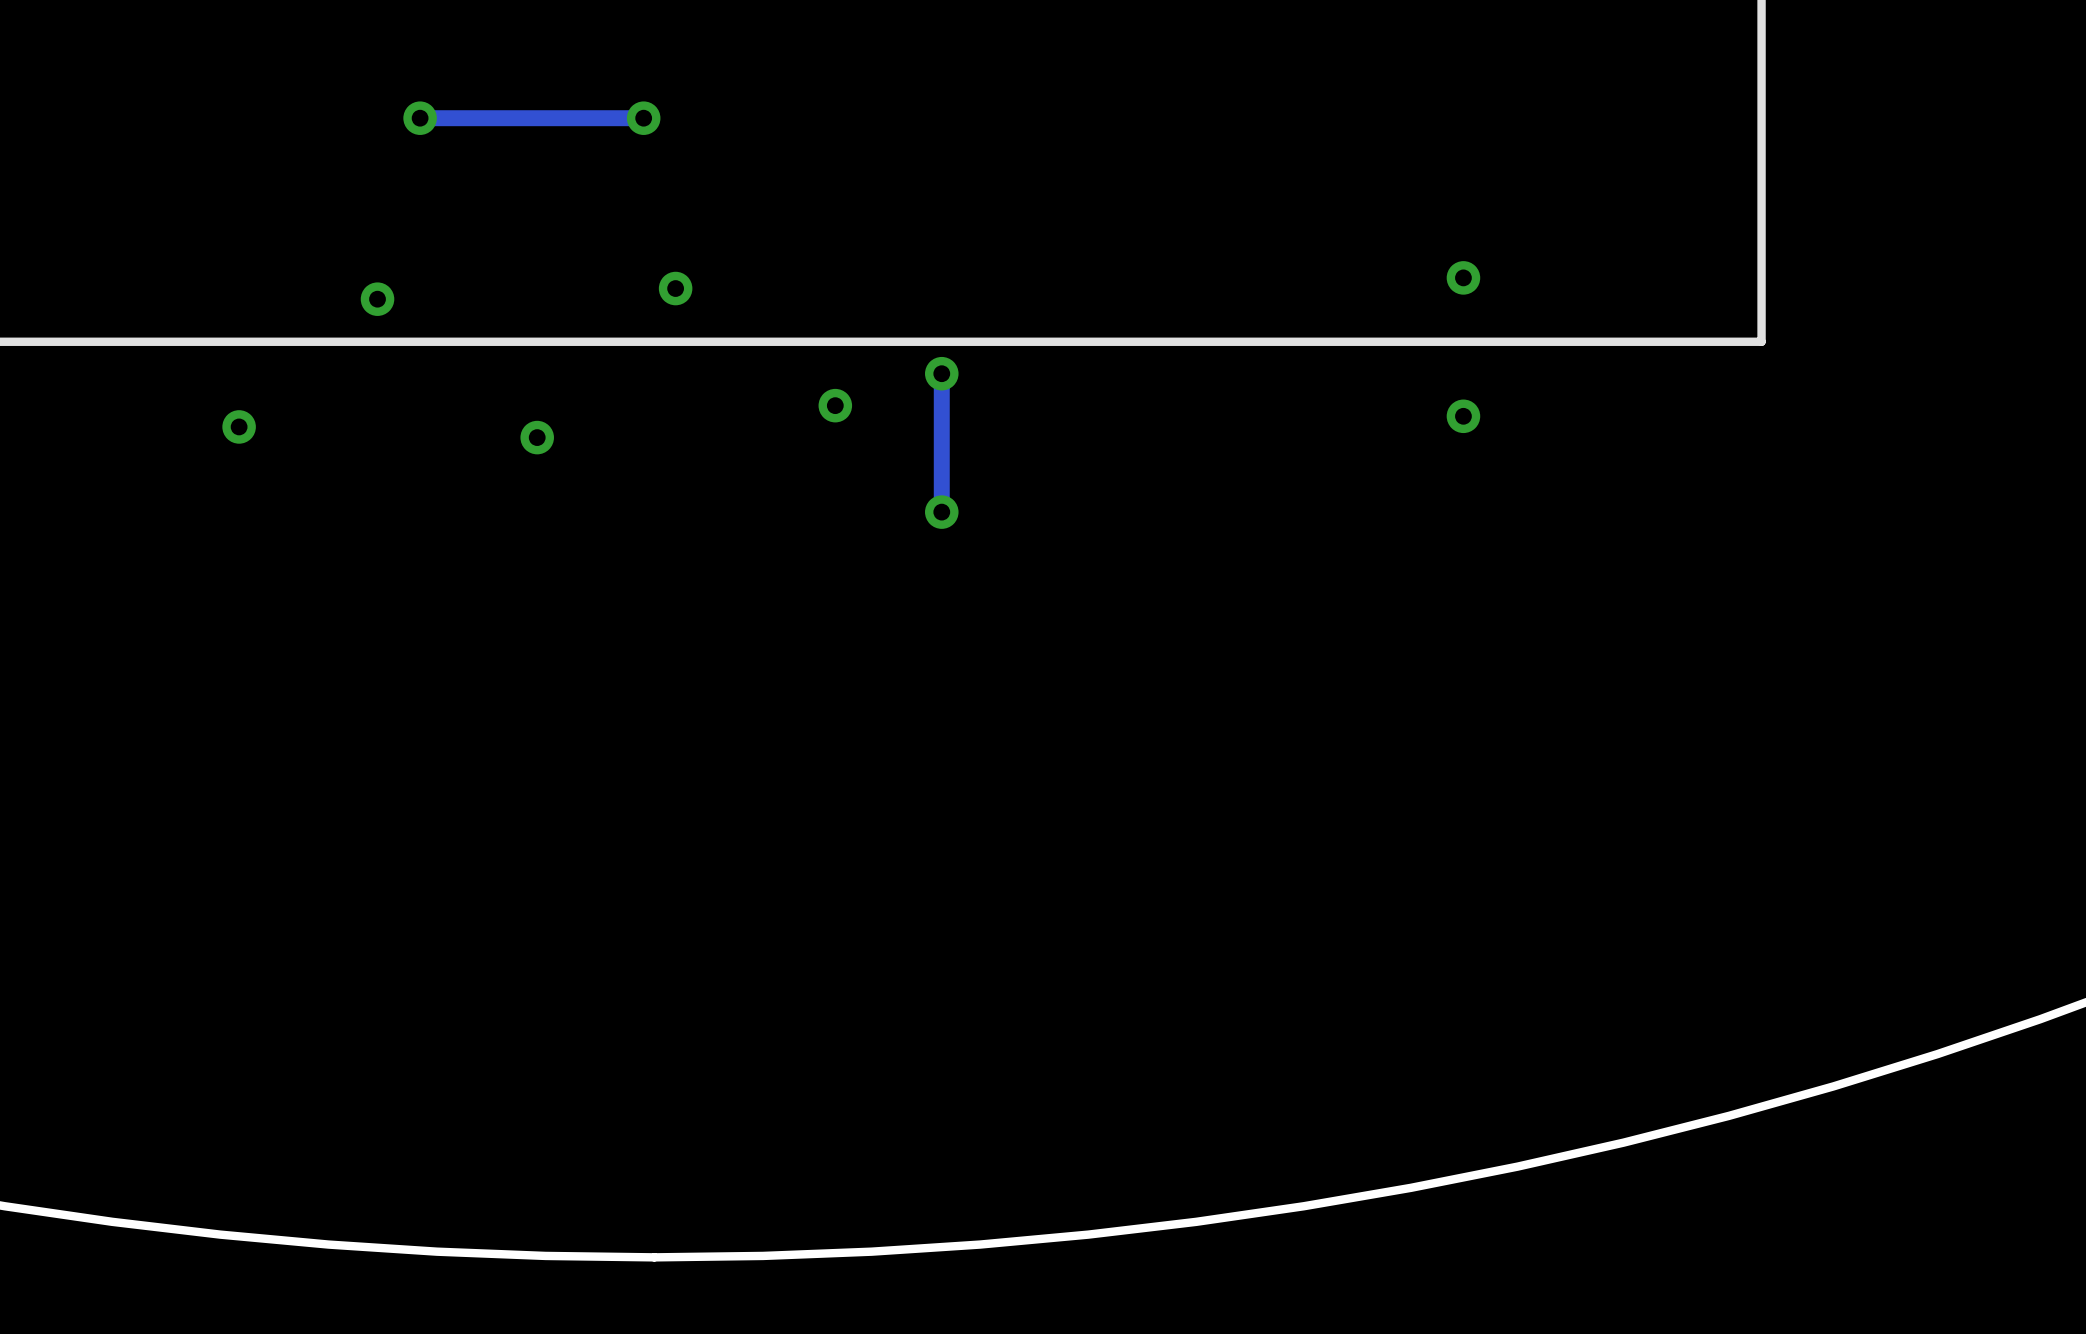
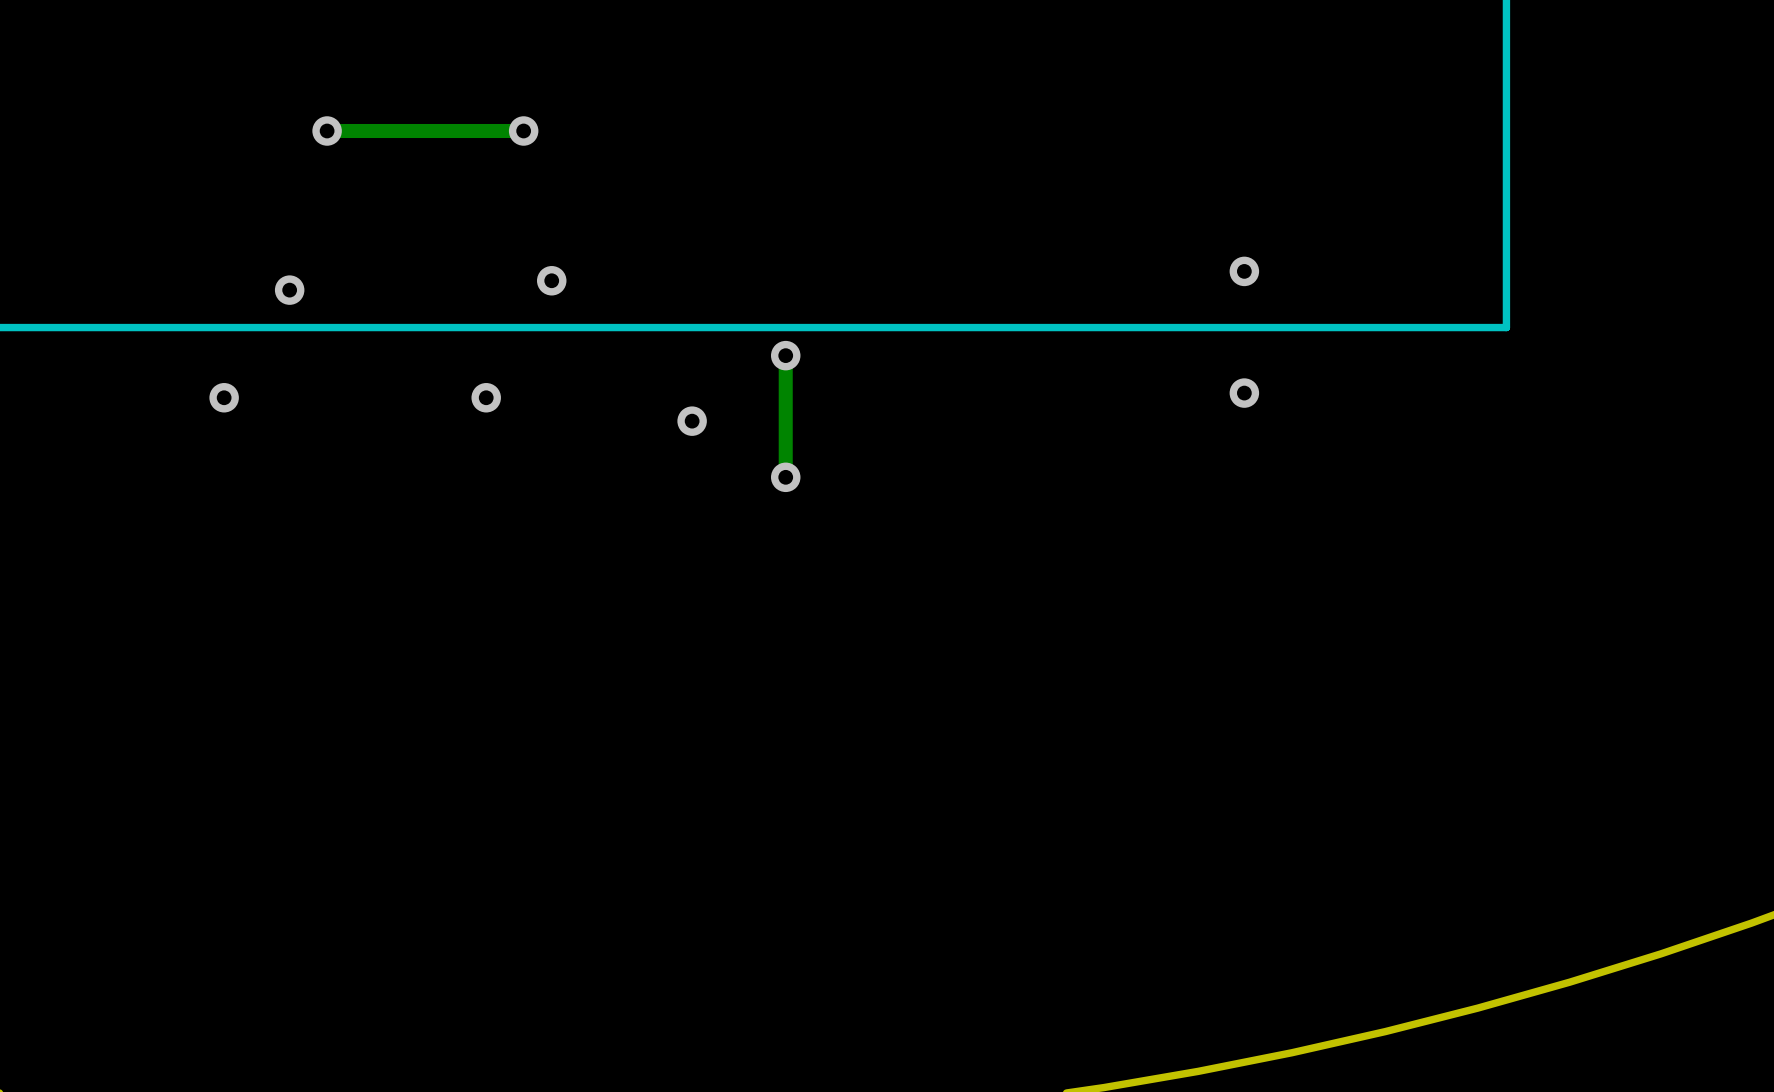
via position: (835, 405) -> (692, 421)
via position: (239, 426) -> (224, 397)
via position: (537, 437) -> (486, 397)

